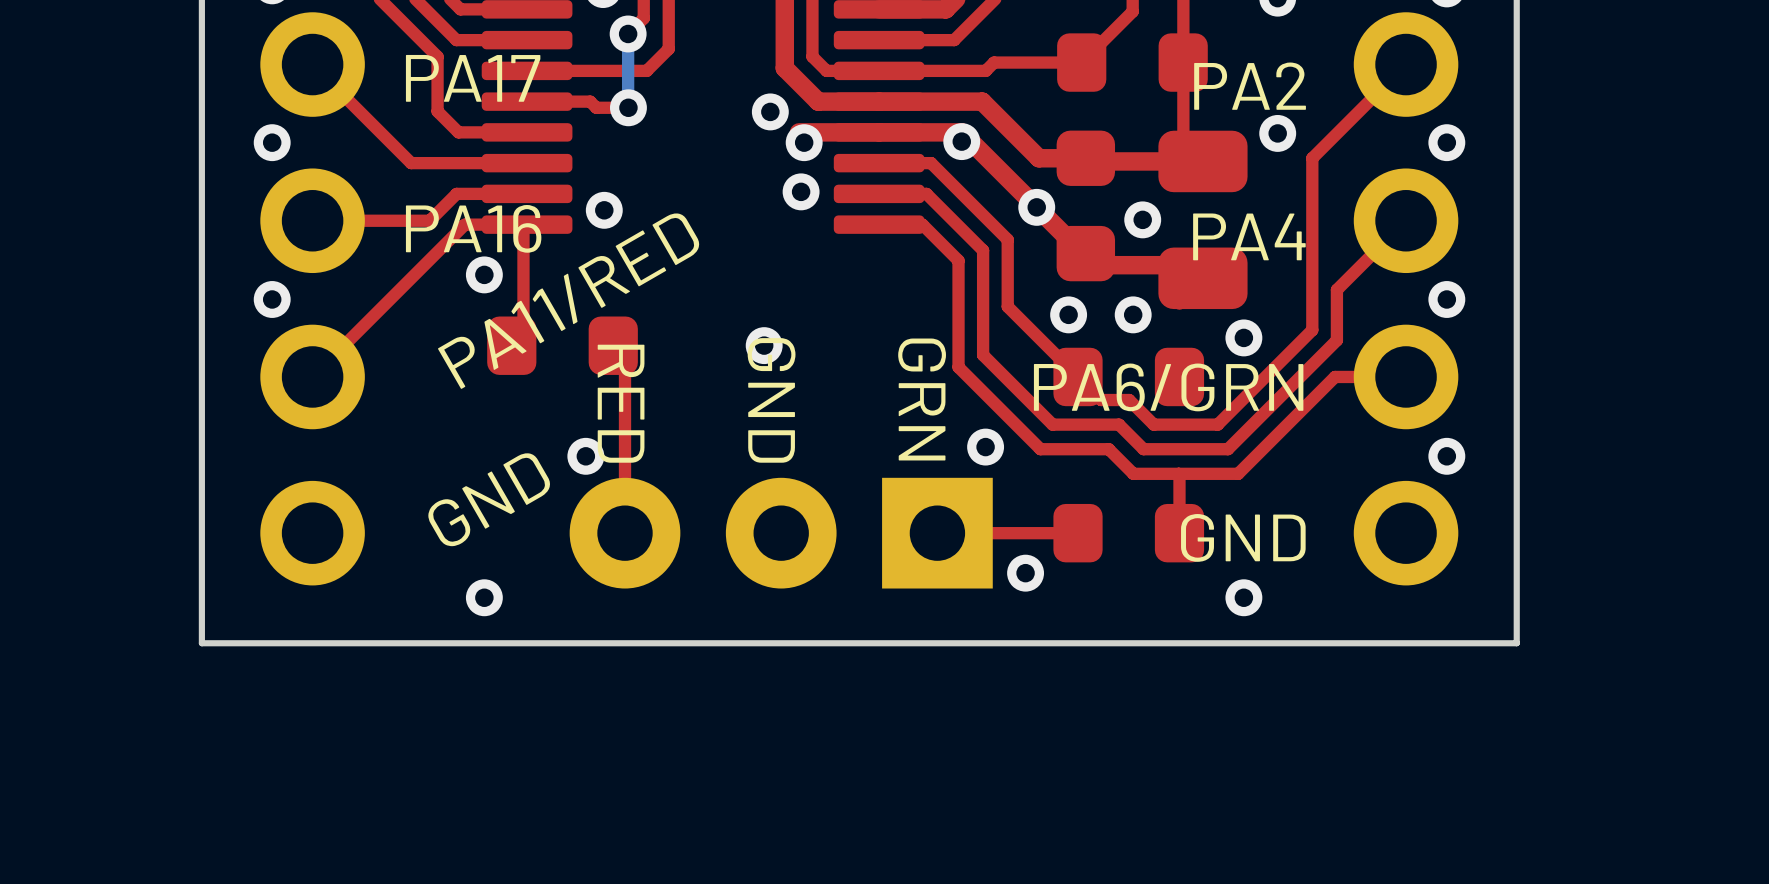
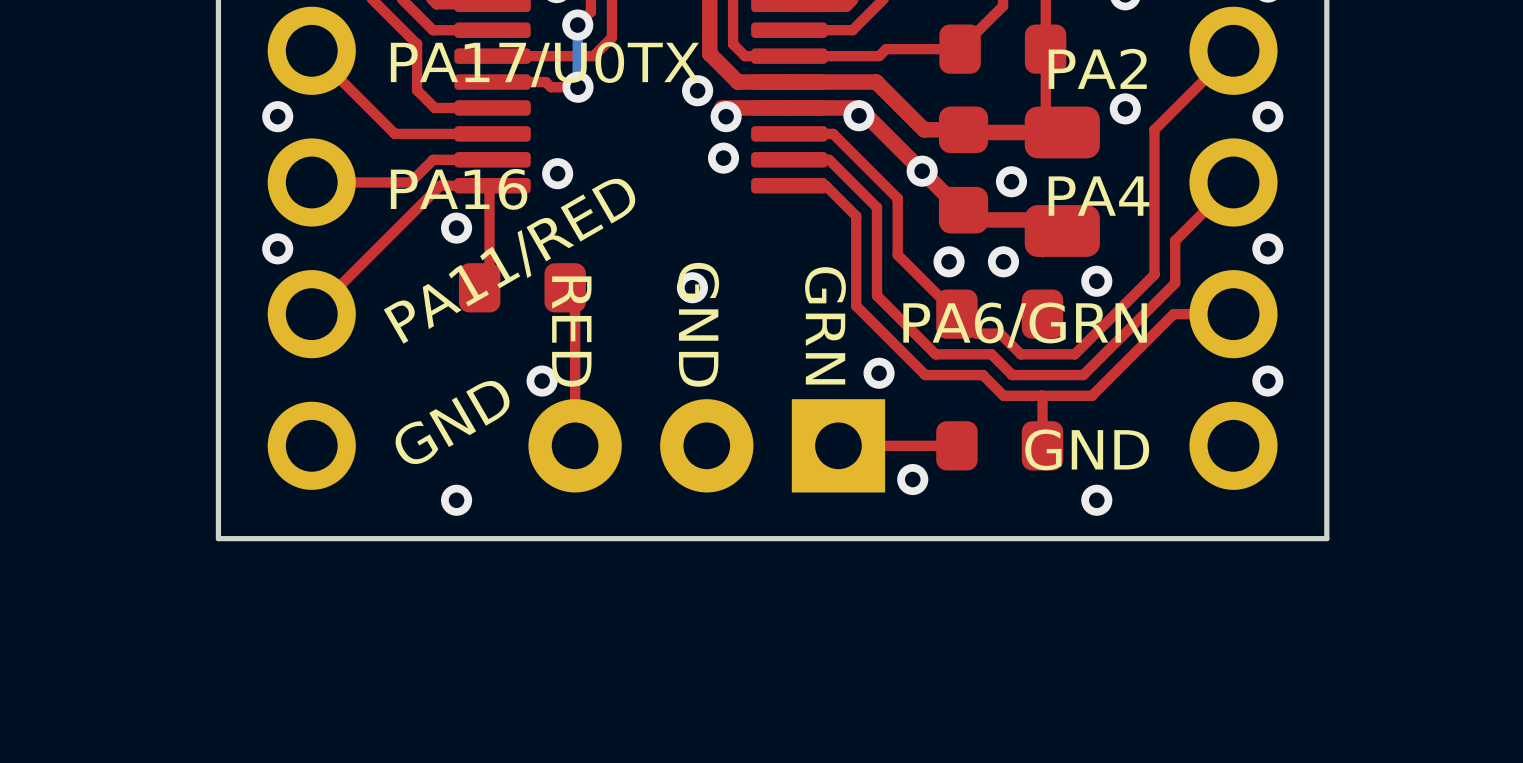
text: PA17 (473, 78) -> PA17/U0TX (545, 64)

